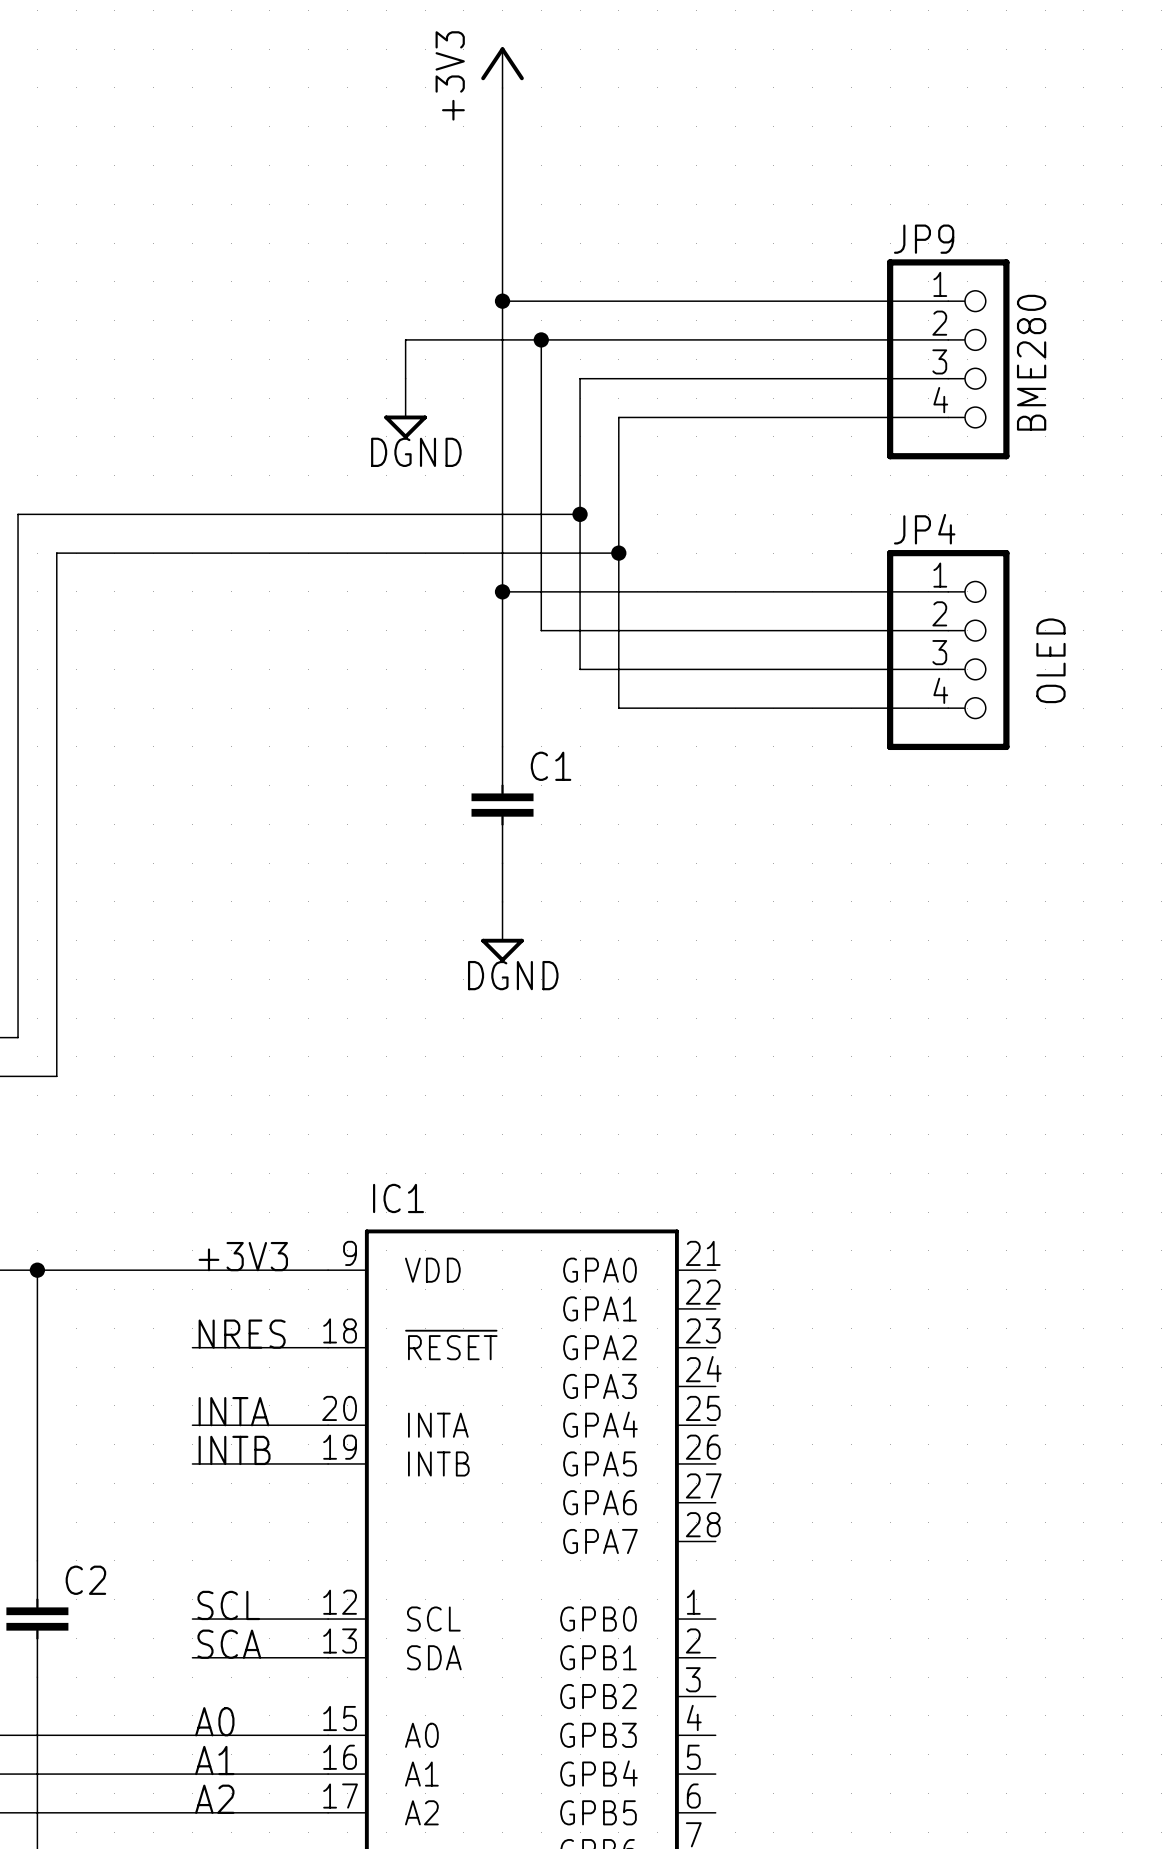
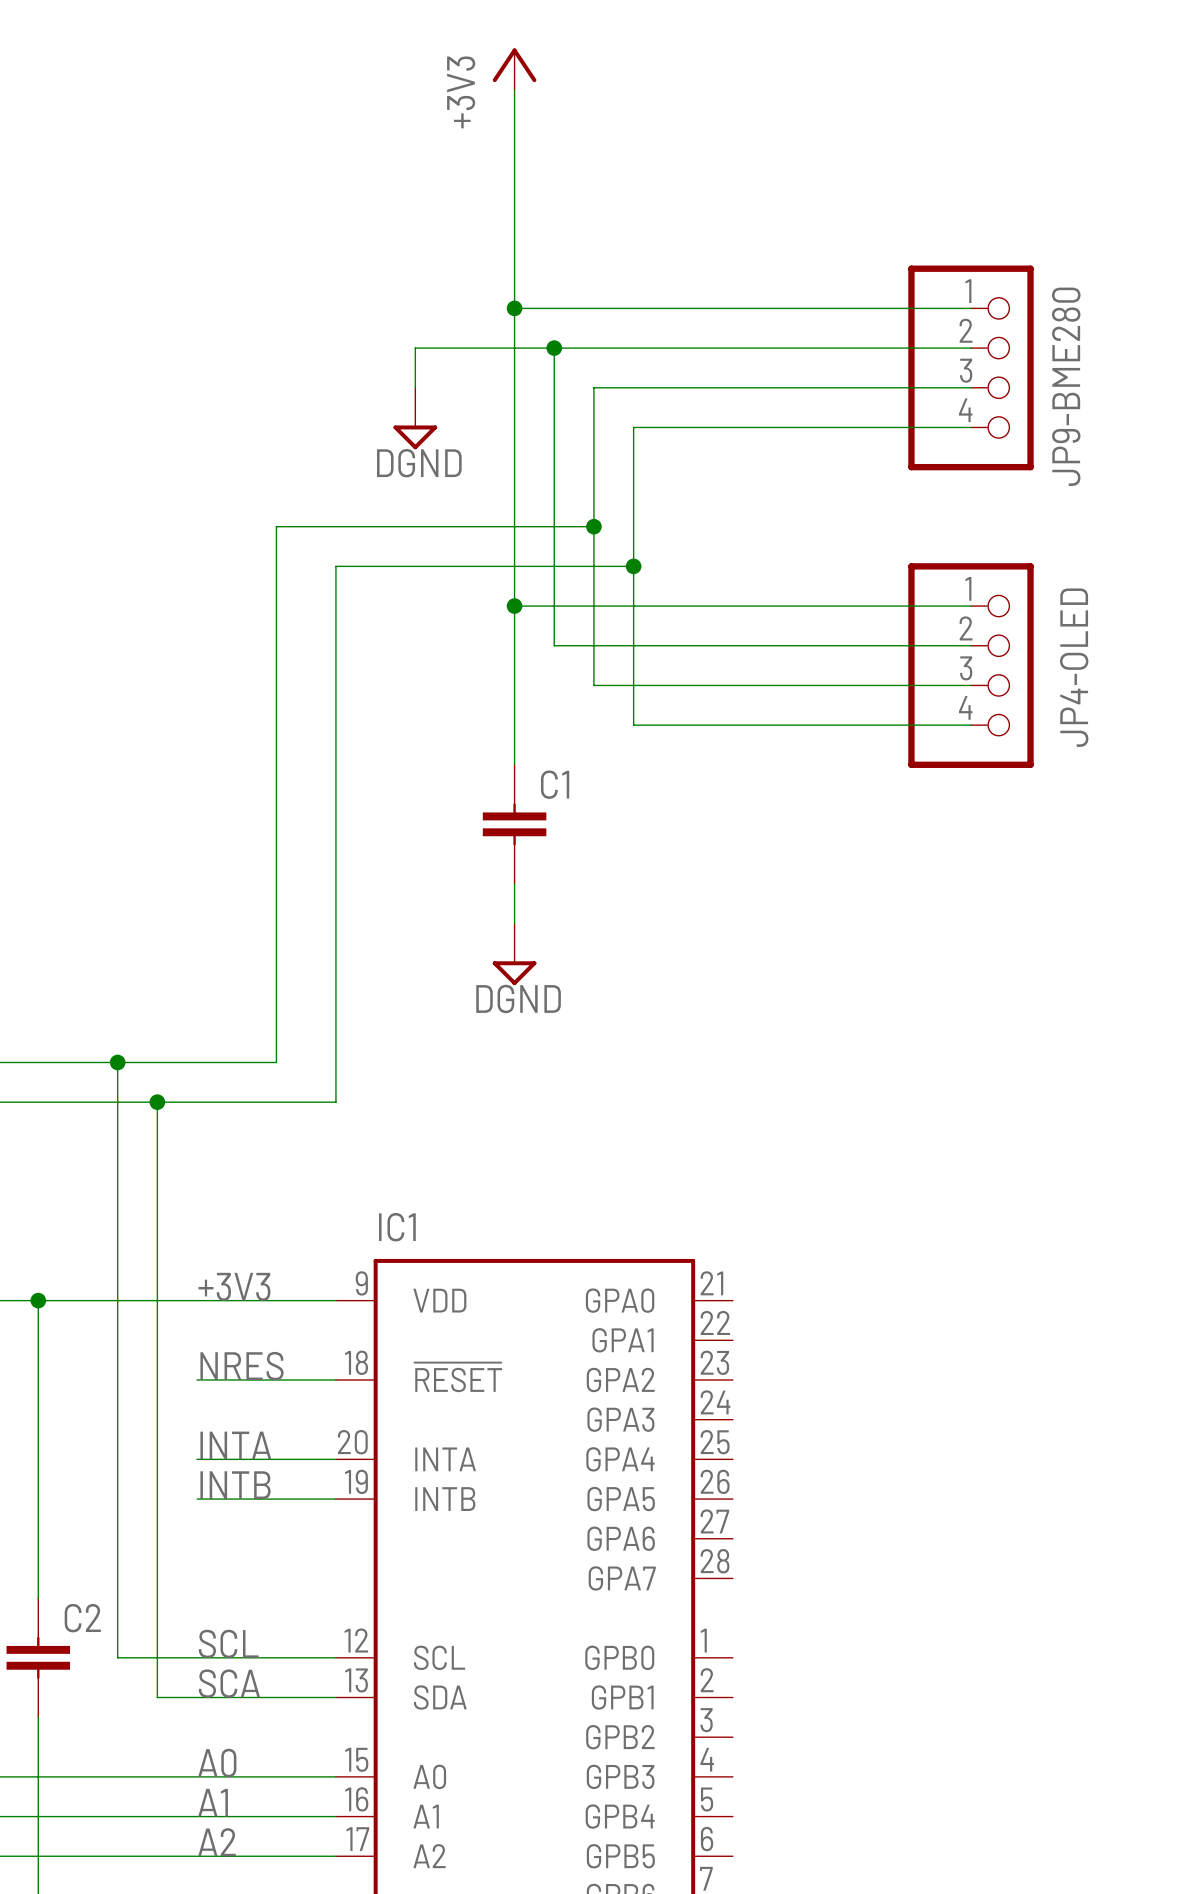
JP9 name: JP9 (924, 239) -> JP9-BME280 (1066, 386)
text: BME280 (1031, 362) -> none
wire: (269, 514) (18, 514) (18, 1037) -> (276, 526) (276, 1062) (18, 1062)
JP4 name: JP4 (924, 529) -> JP4-OLED (1074, 667)
wire: (328, 553) (56, 553) (56, 1076) -> (335, 566) (335, 1102) (58, 1102)
text: OLED (1050, 660) -> none
wire: none -> (117, 1062) (117, 1657) (197, 1657)
junction: none -> (117, 1062)
wire: none -> (157, 1102) (157, 1697) (197, 1697)
junction: none -> (157, 1102)

